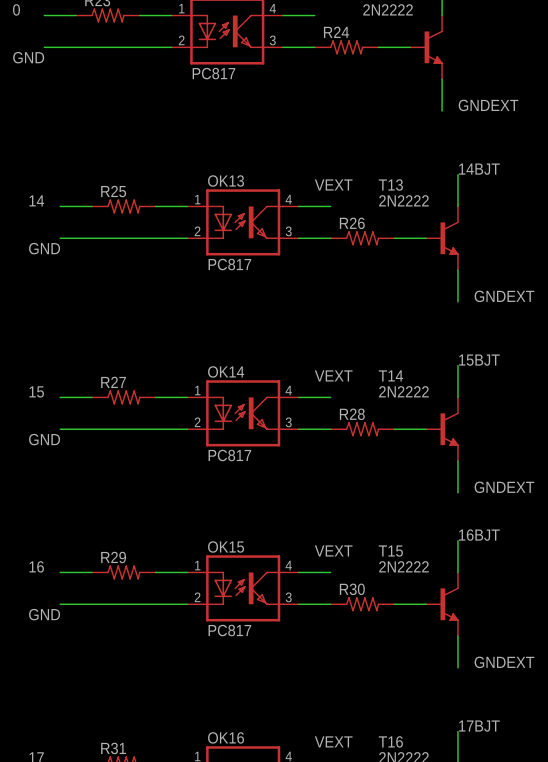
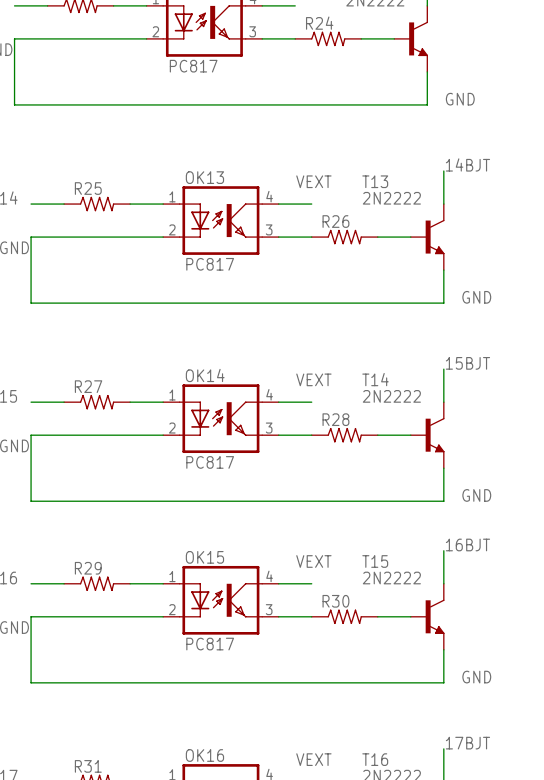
wire: none -> (14, 38) (14, 104) (427, 104)
label: GNDEXT (488, 105) -> GND (460, 99)
wire: none -> (31, 237) (31, 303) (443, 303)
label: GNDEXT (504, 296) -> GND (476, 297)
wire: none -> (31, 435) (31, 501) (443, 501)
label: GNDEXT (504, 487) -> GND (476, 495)
wire: none -> (31, 616) (31, 682) (443, 682)
label: GNDEXT (504, 662) -> GND (476, 677)

